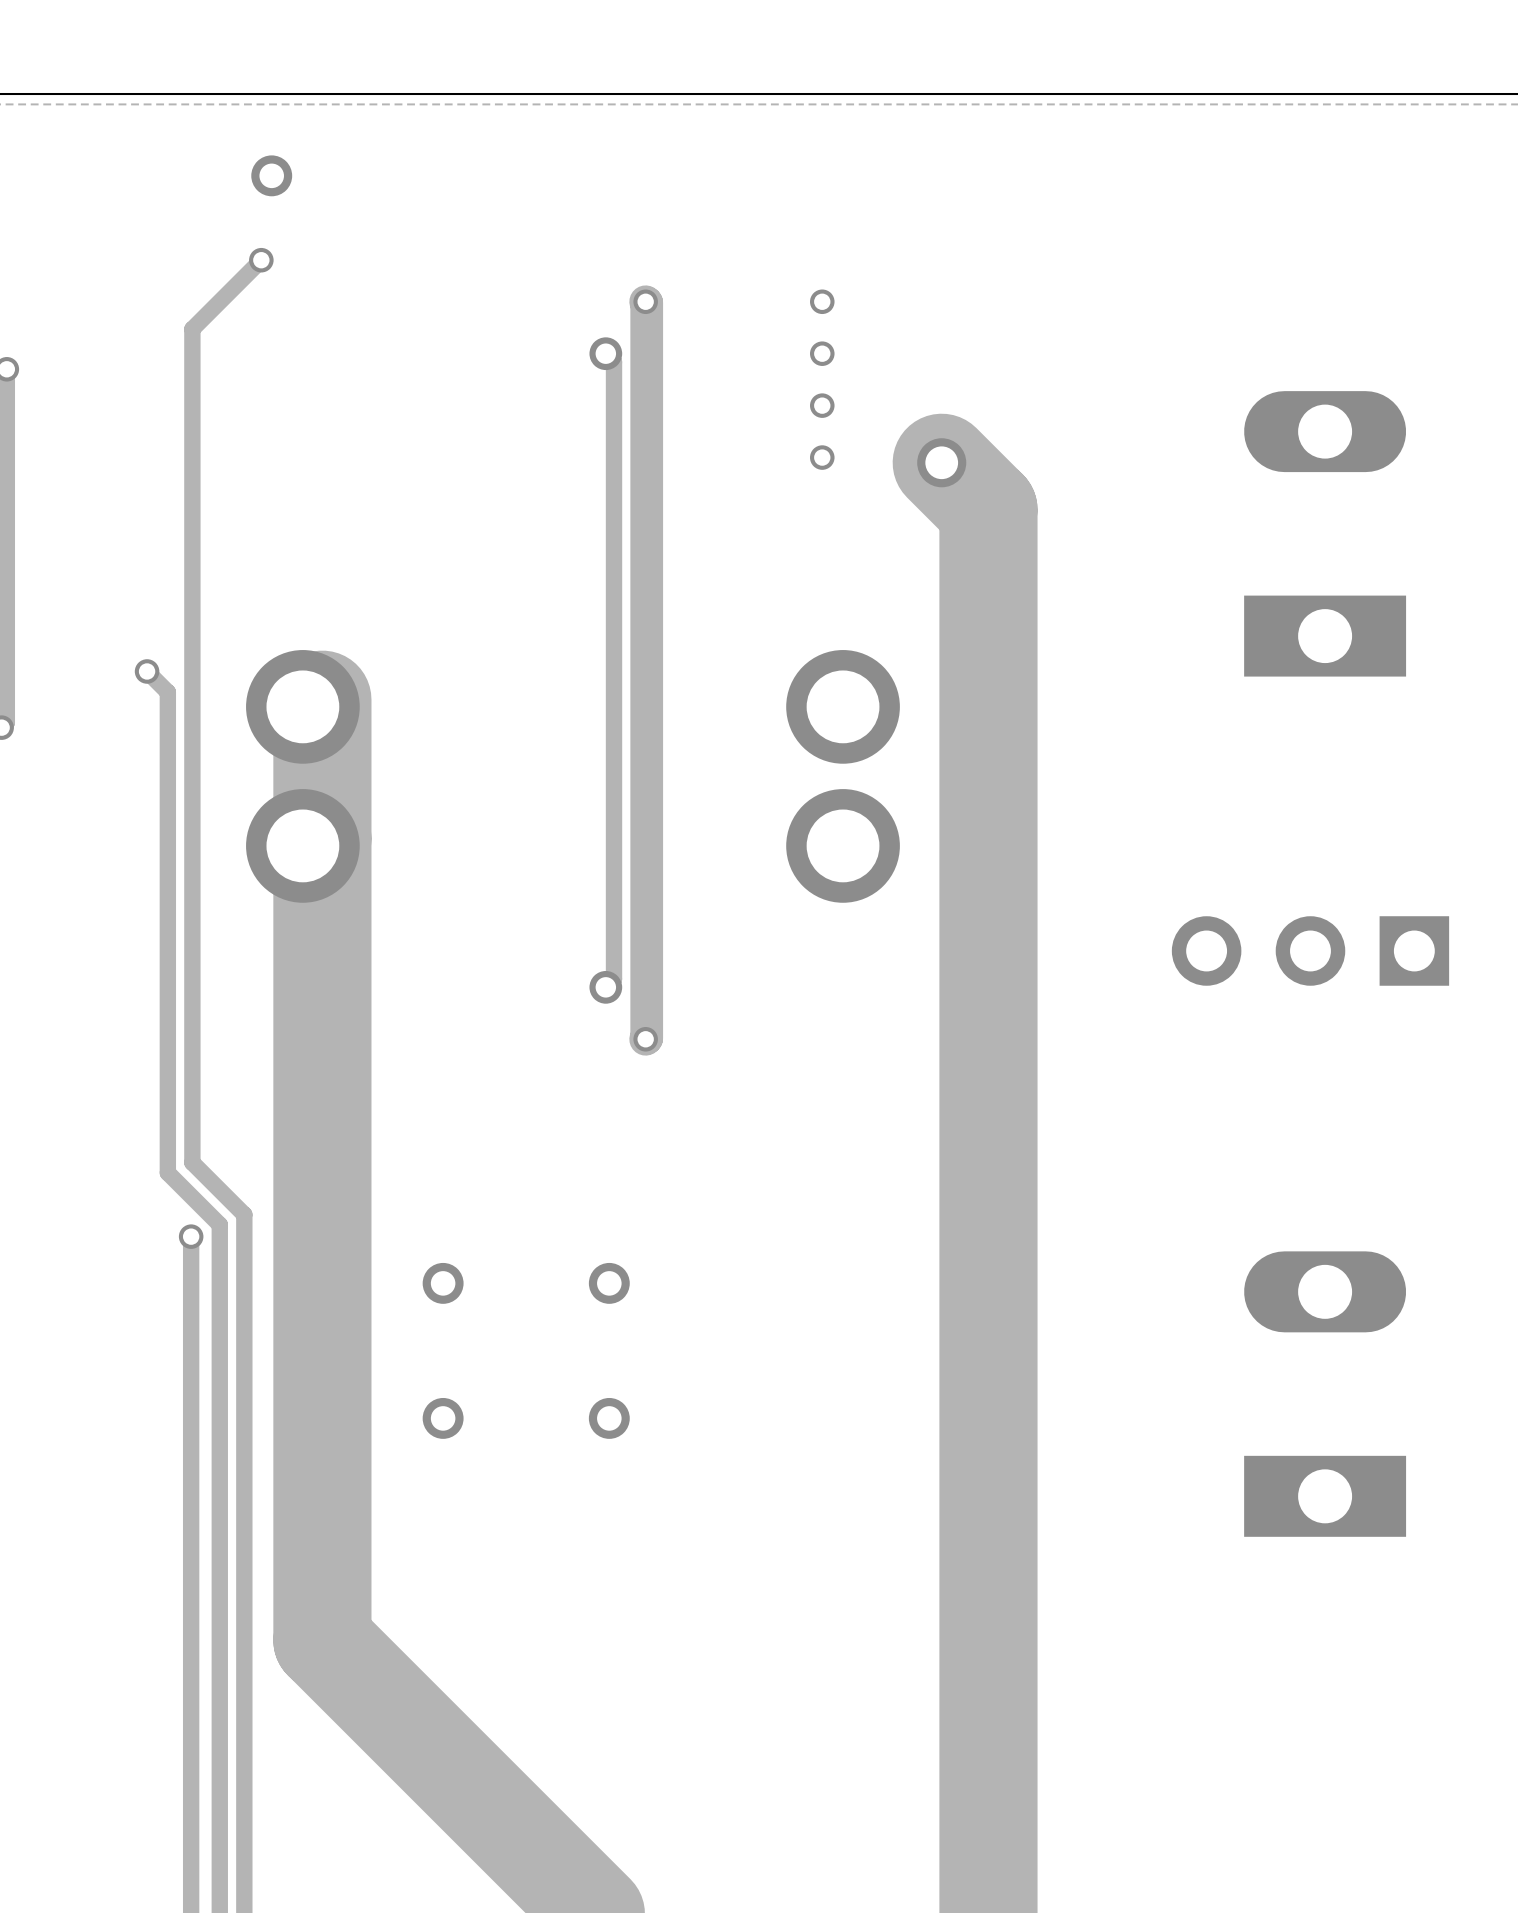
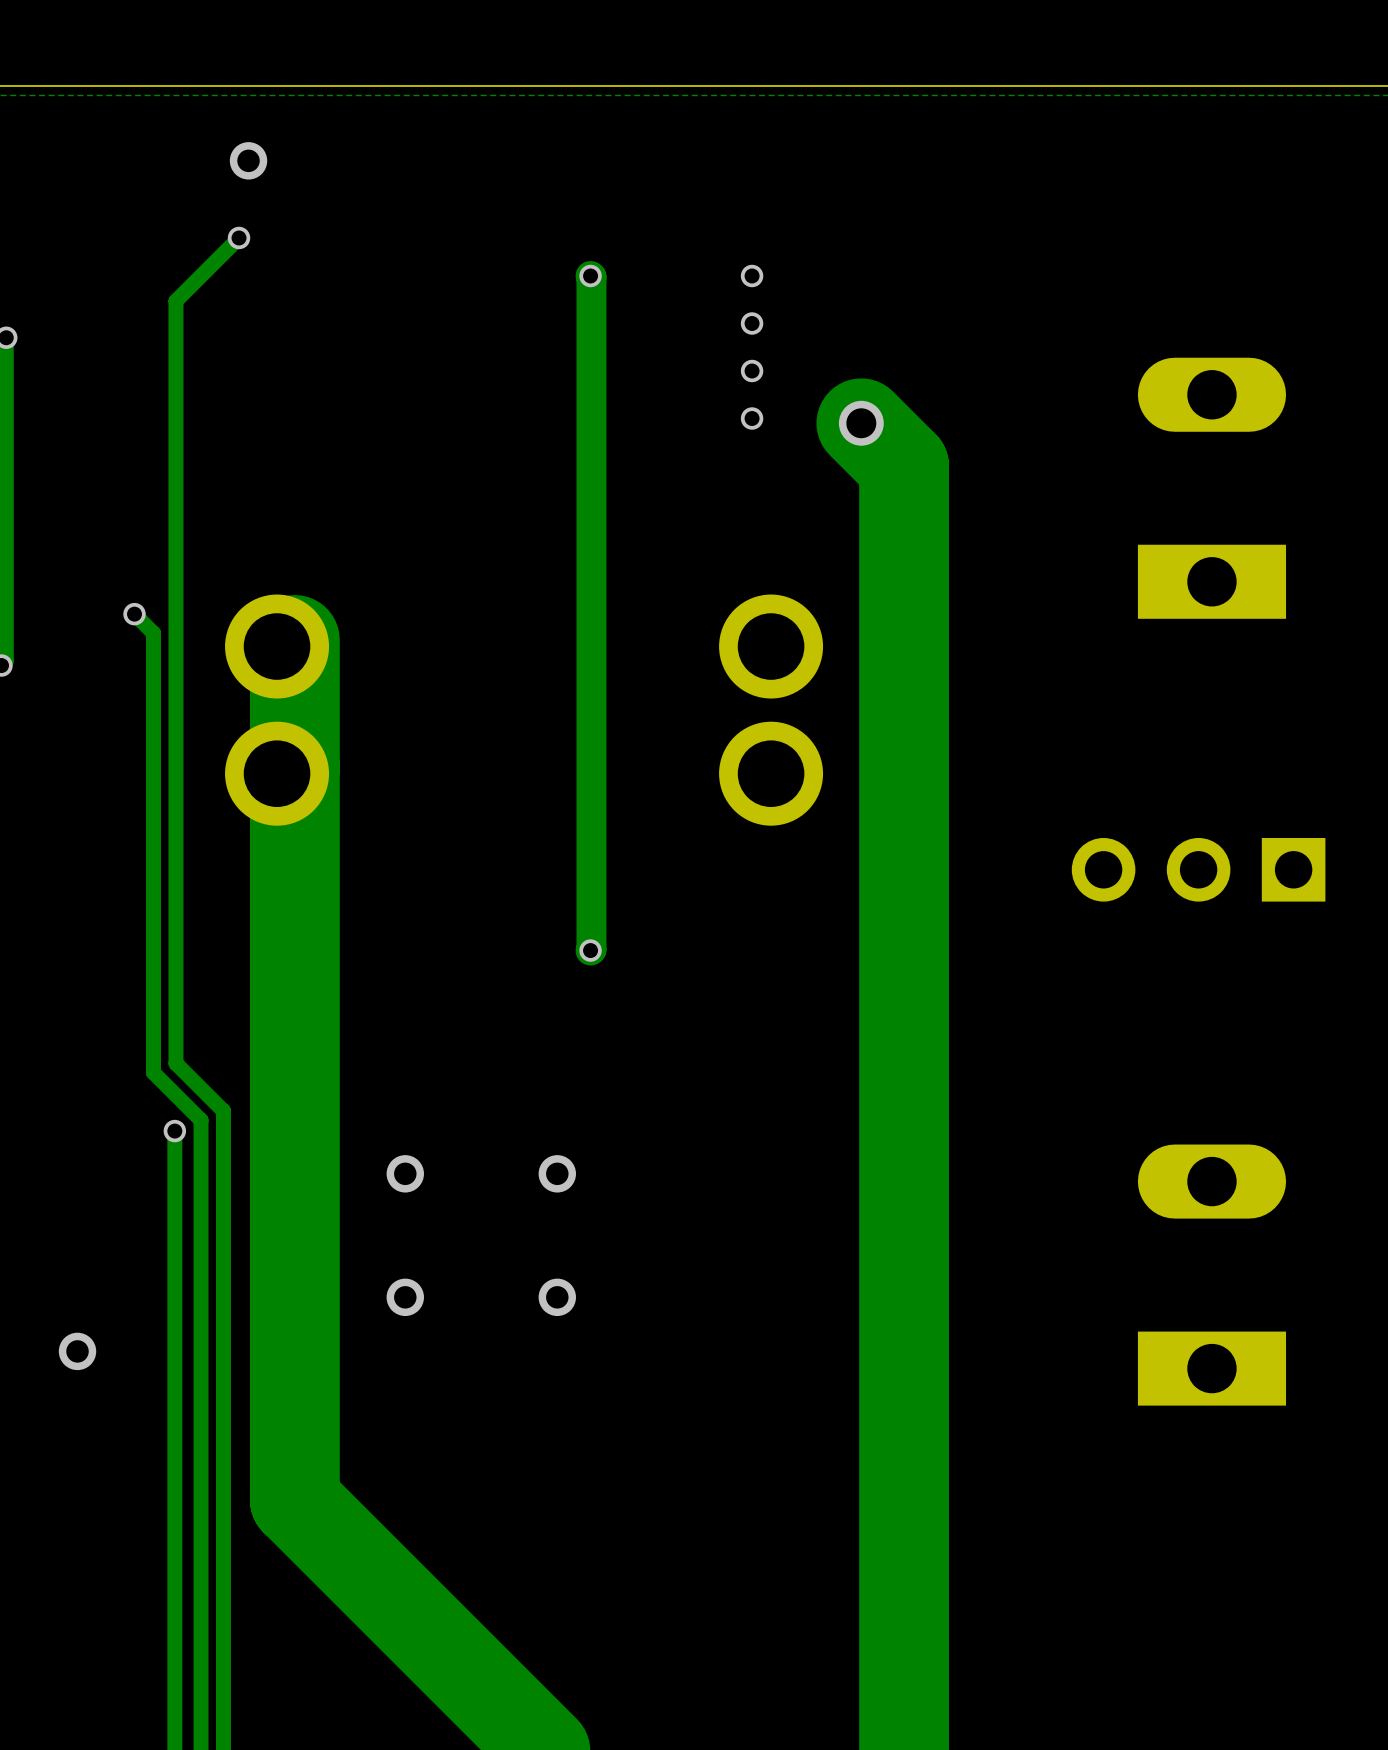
track: (605, 353) (614, 361) (614, 979) (605, 987) -> none
via: (605, 353) -> none
via: (605, 987) -> none
via: none -> (77, 1351)

